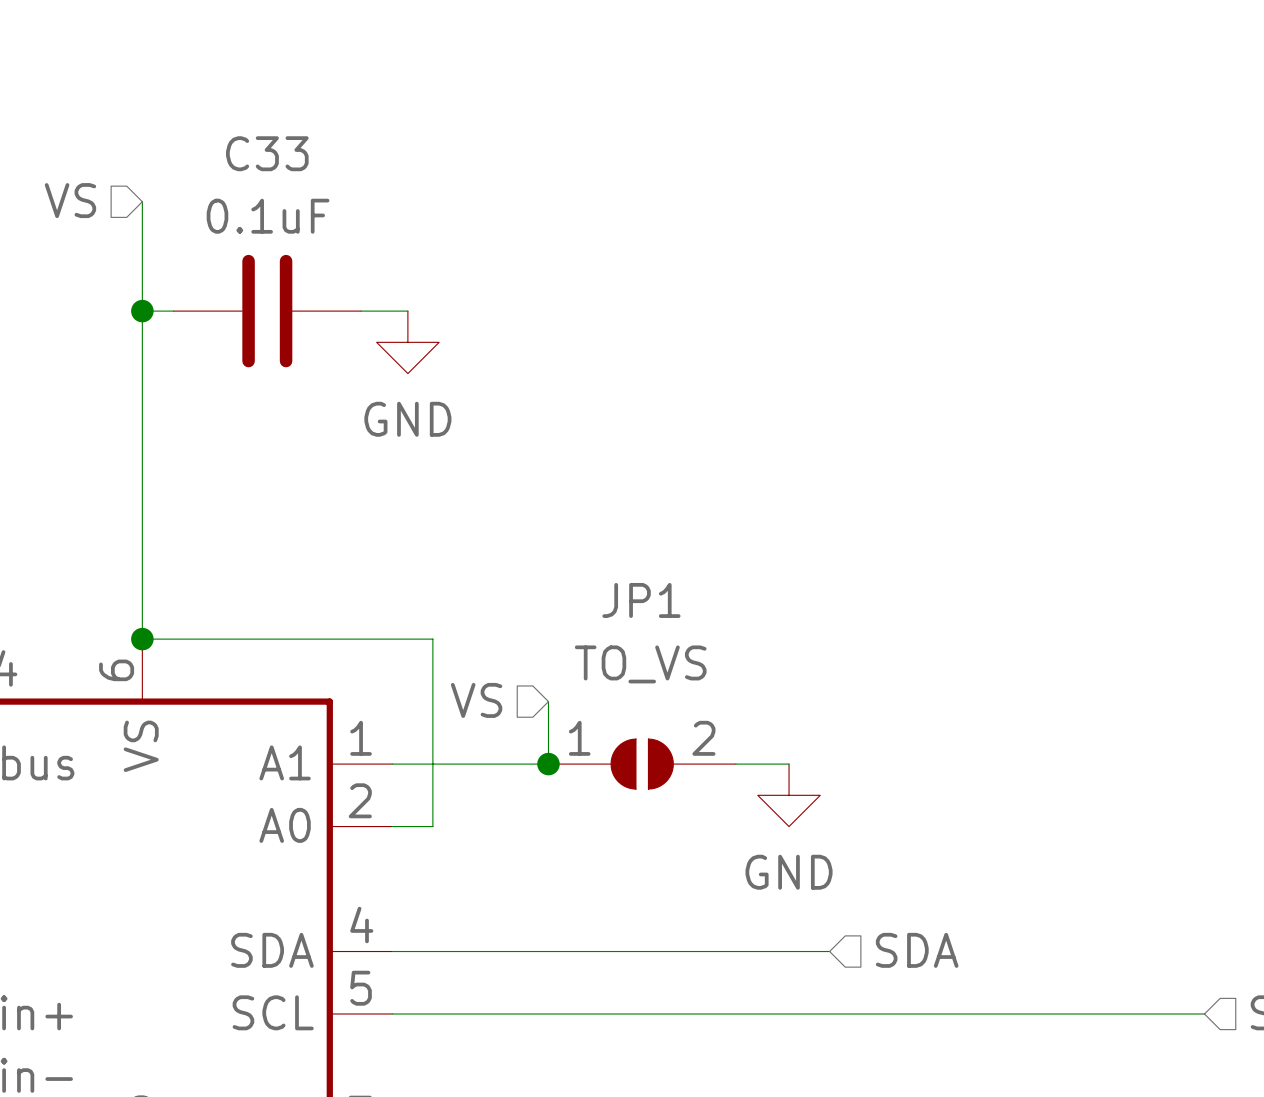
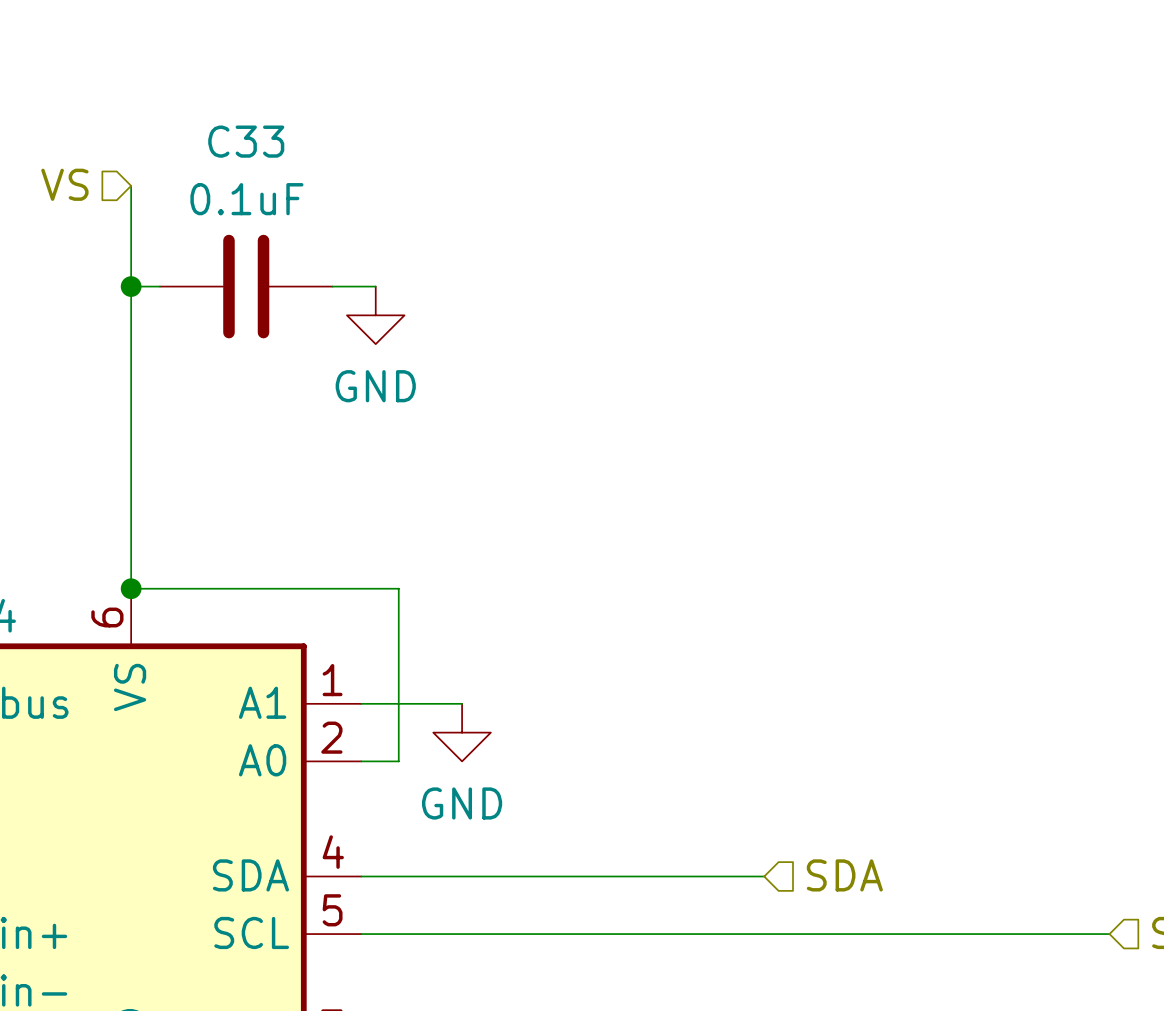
hierarchical label: VS (476, 700) -> none
wire: (548, 701) (548, 764) (501, 764) -> none
junction: (548, 764) -> none
JP1: TO_VS (642, 764) -> none
wire: (735, 764) (789, 764) -> none
power symbol position: GND (789, 795) -> GND (462, 732)

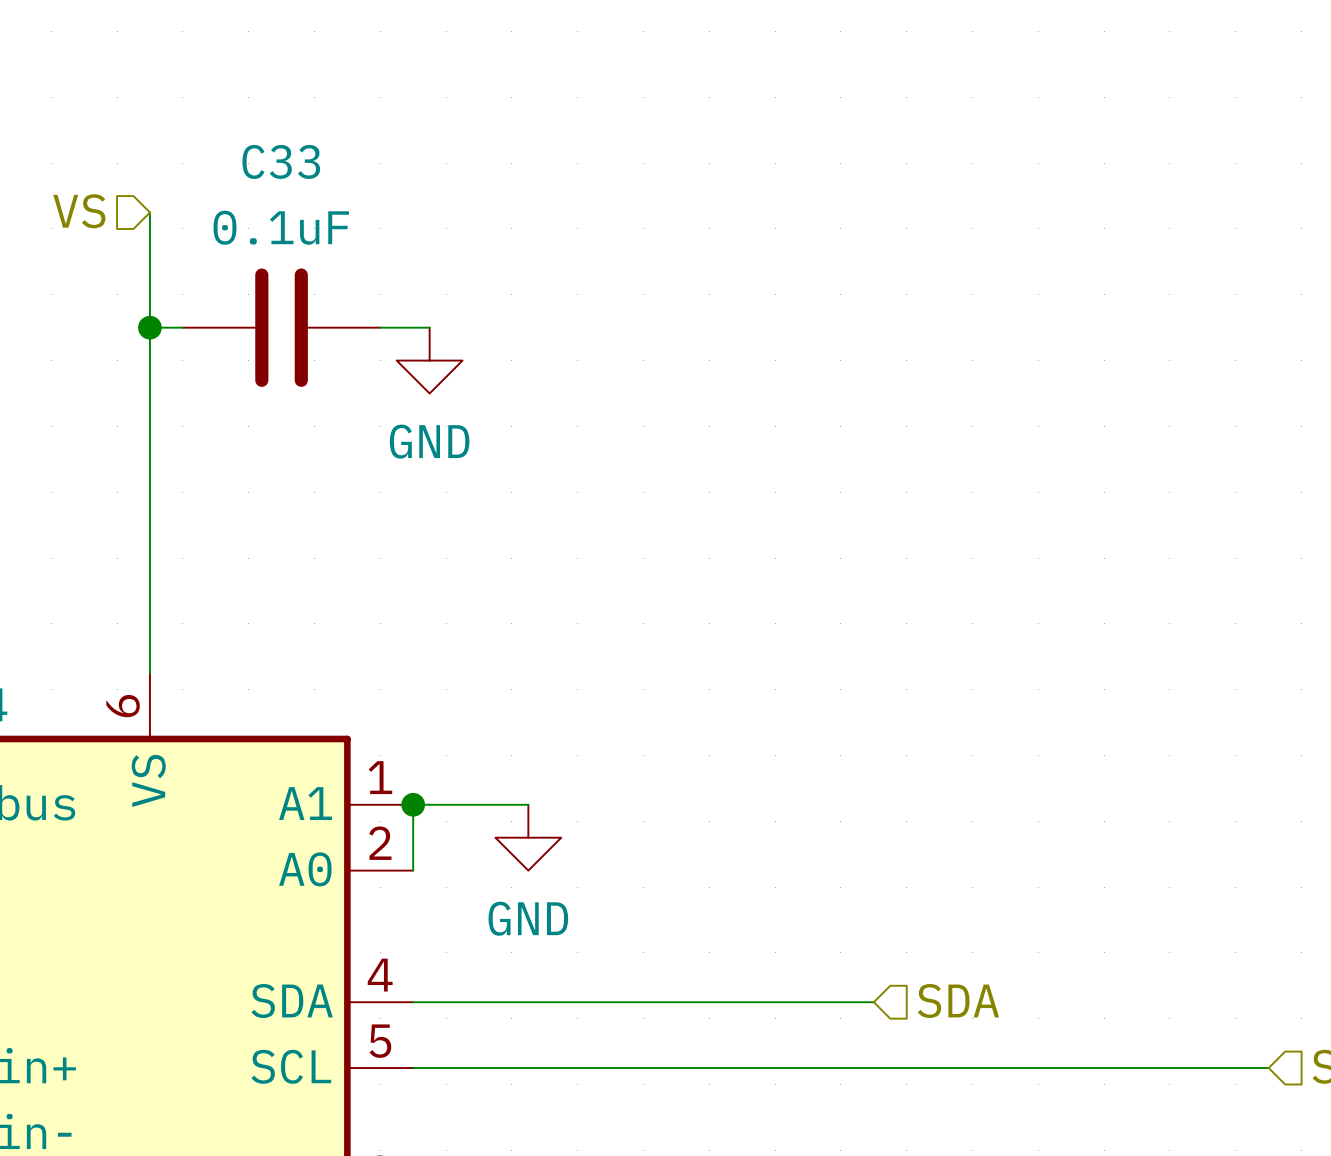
wire: (131, 588) (398, 588) (398, 761) (361, 761) -> (413, 804) (413, 870)
junction: (131, 588) -> none
junction: none -> (413, 804)

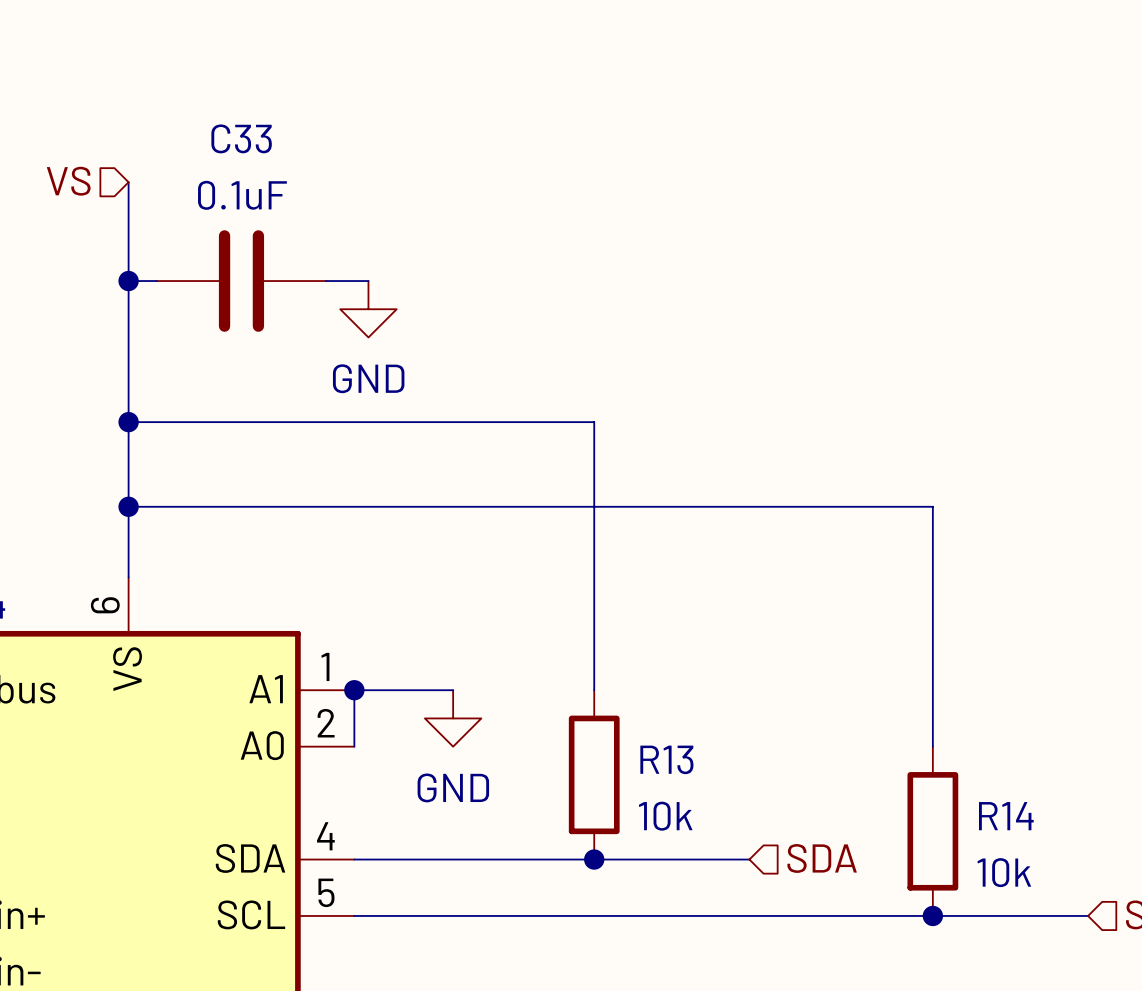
wire: none -> (128, 422) (594, 422) (594, 690)
junction: none -> (128, 422)
wire: none -> (128, 506) (932, 506) (932, 746)
junction: none -> (128, 506)
R13: none -> 10k (594, 774)
R14: none -> 10k (932, 831)
junction: none -> (594, 859)
junction: none -> (932, 915)

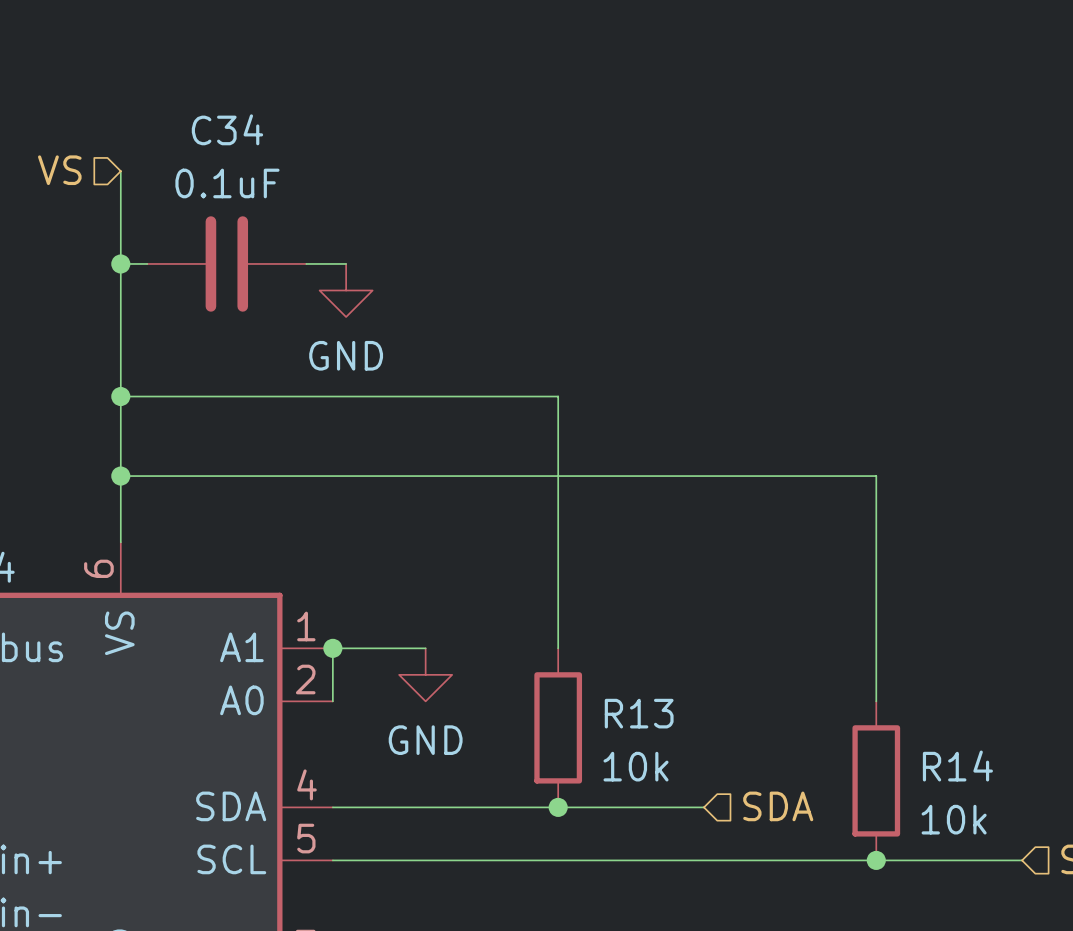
C33 name: C33 (241, 138) -> C34 (227, 129)

